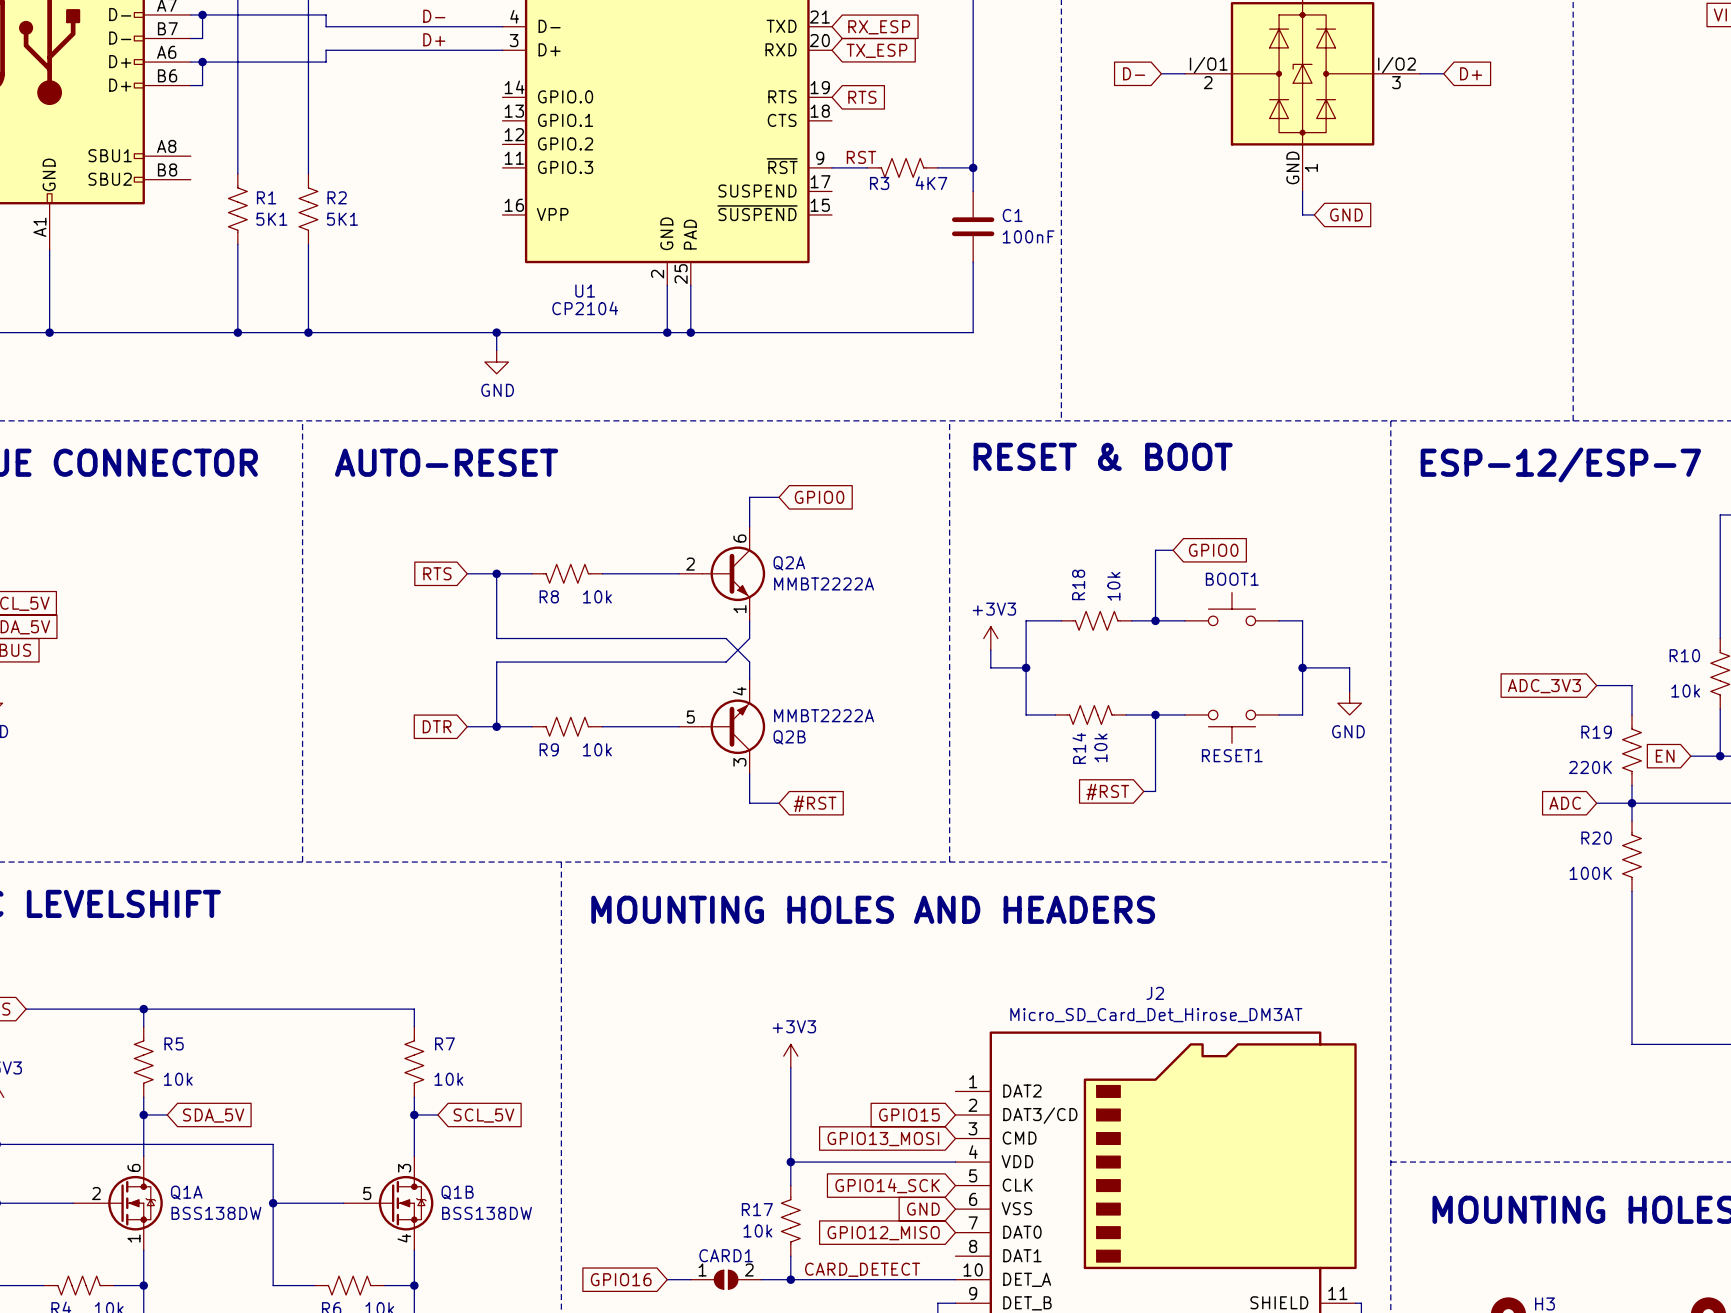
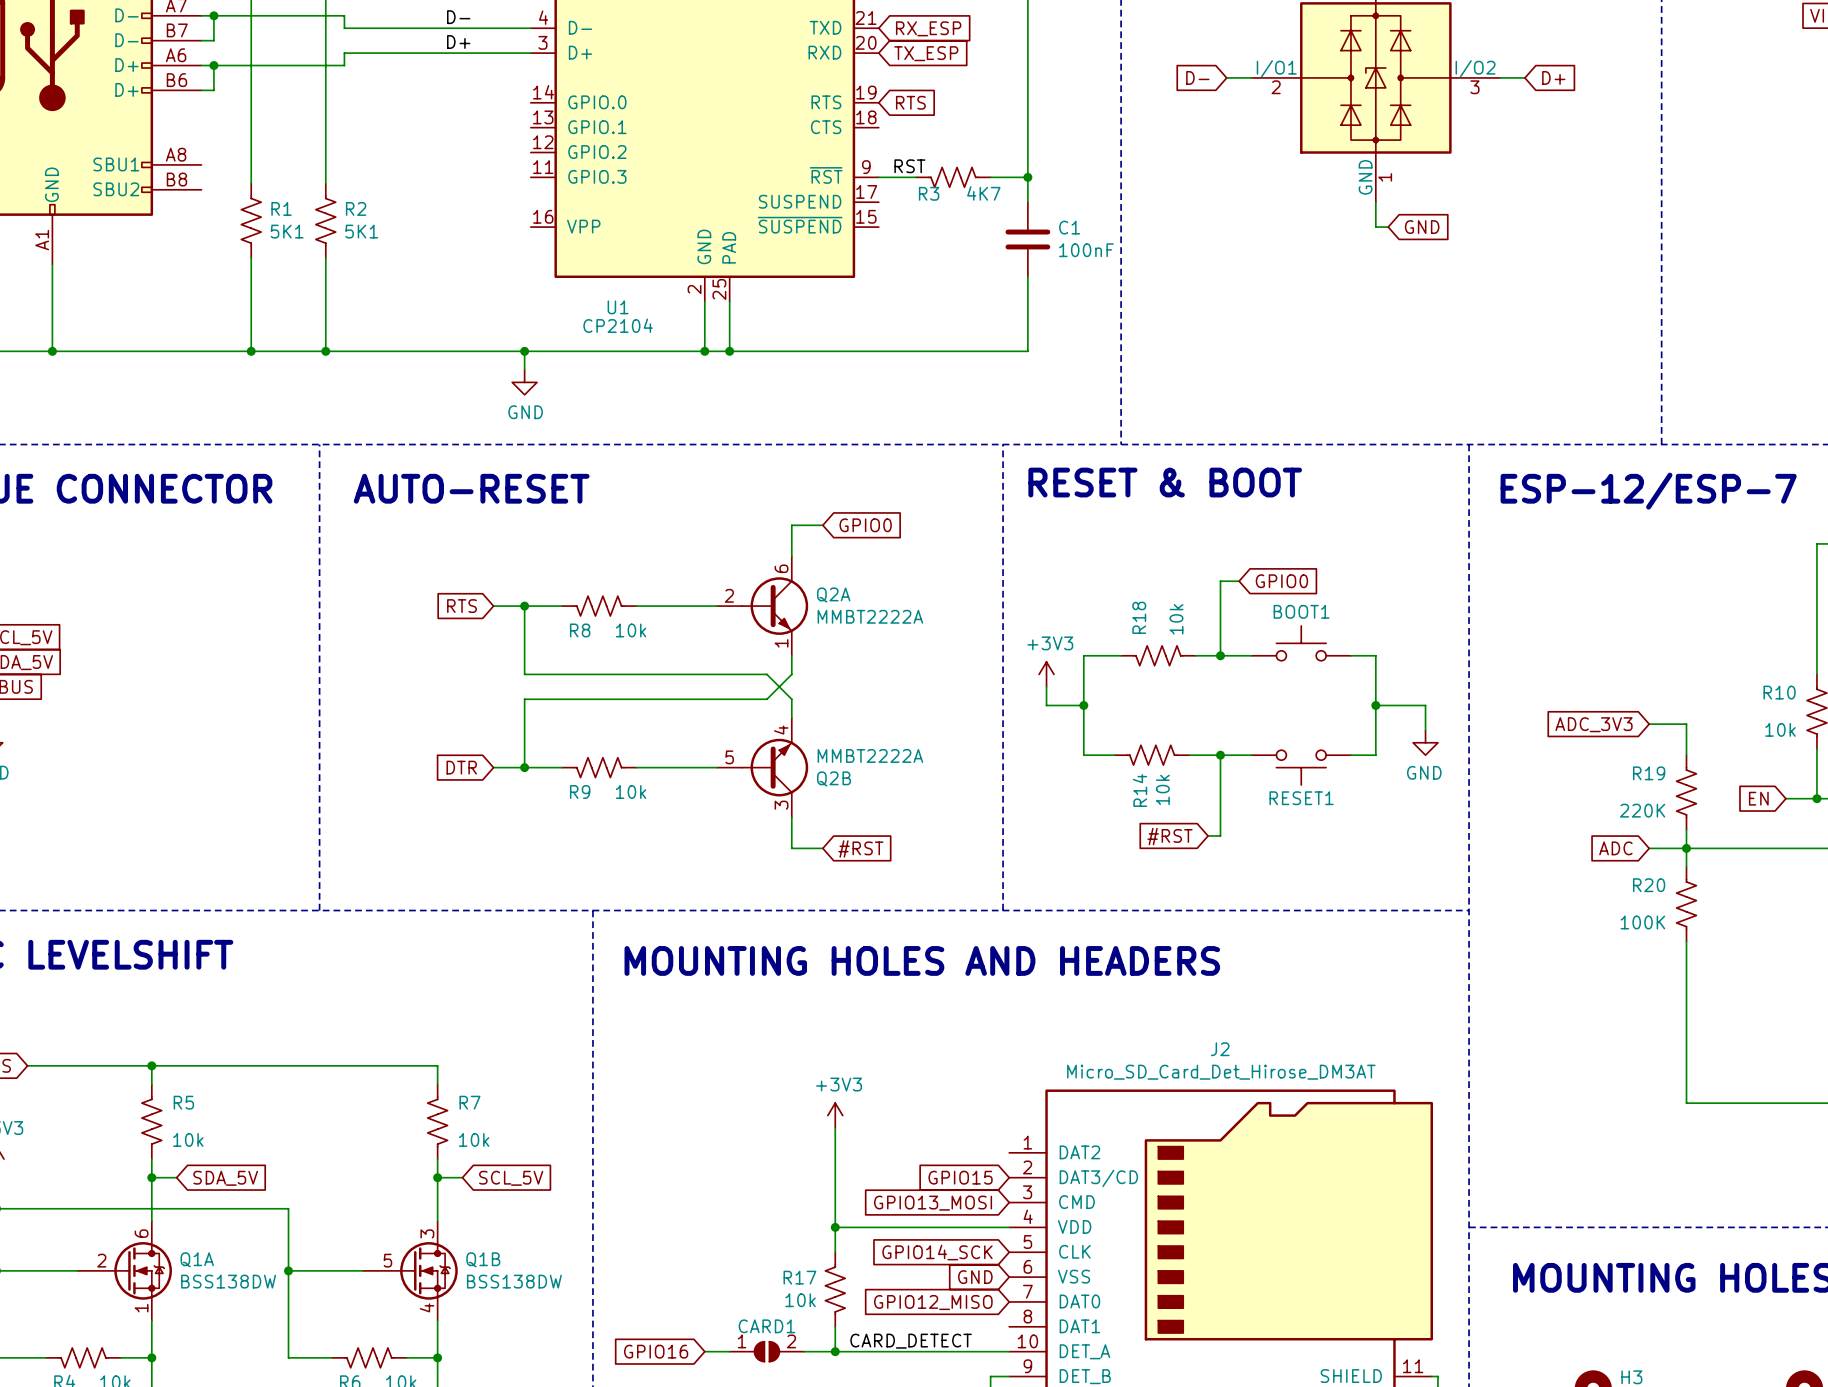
wire: (1596, 685) (1631, 685) (1631, 714) -> (1649, 724) (1686, 724) (1686, 755)
global label position: ADC_3V3 (1544, 686) -> ADC_3V3 (1594, 724)
R19 position: (1631, 750) -> (1686, 792)
wire: (1631, 785) (1631, 820) -> (1686, 829) (1686, 867)
wire: none -> (1649, 848) (1686, 848)
global label position: ADC (1565, 803) -> ADC (1615, 848)
junction position: (1631, 803) -> (1686, 848)
R20 position: (1631, 856) -> (1686, 904)
wire: (1631, 891) (1631, 1044) -> (1686, 941) (1686, 1103) (1723, 1103)

